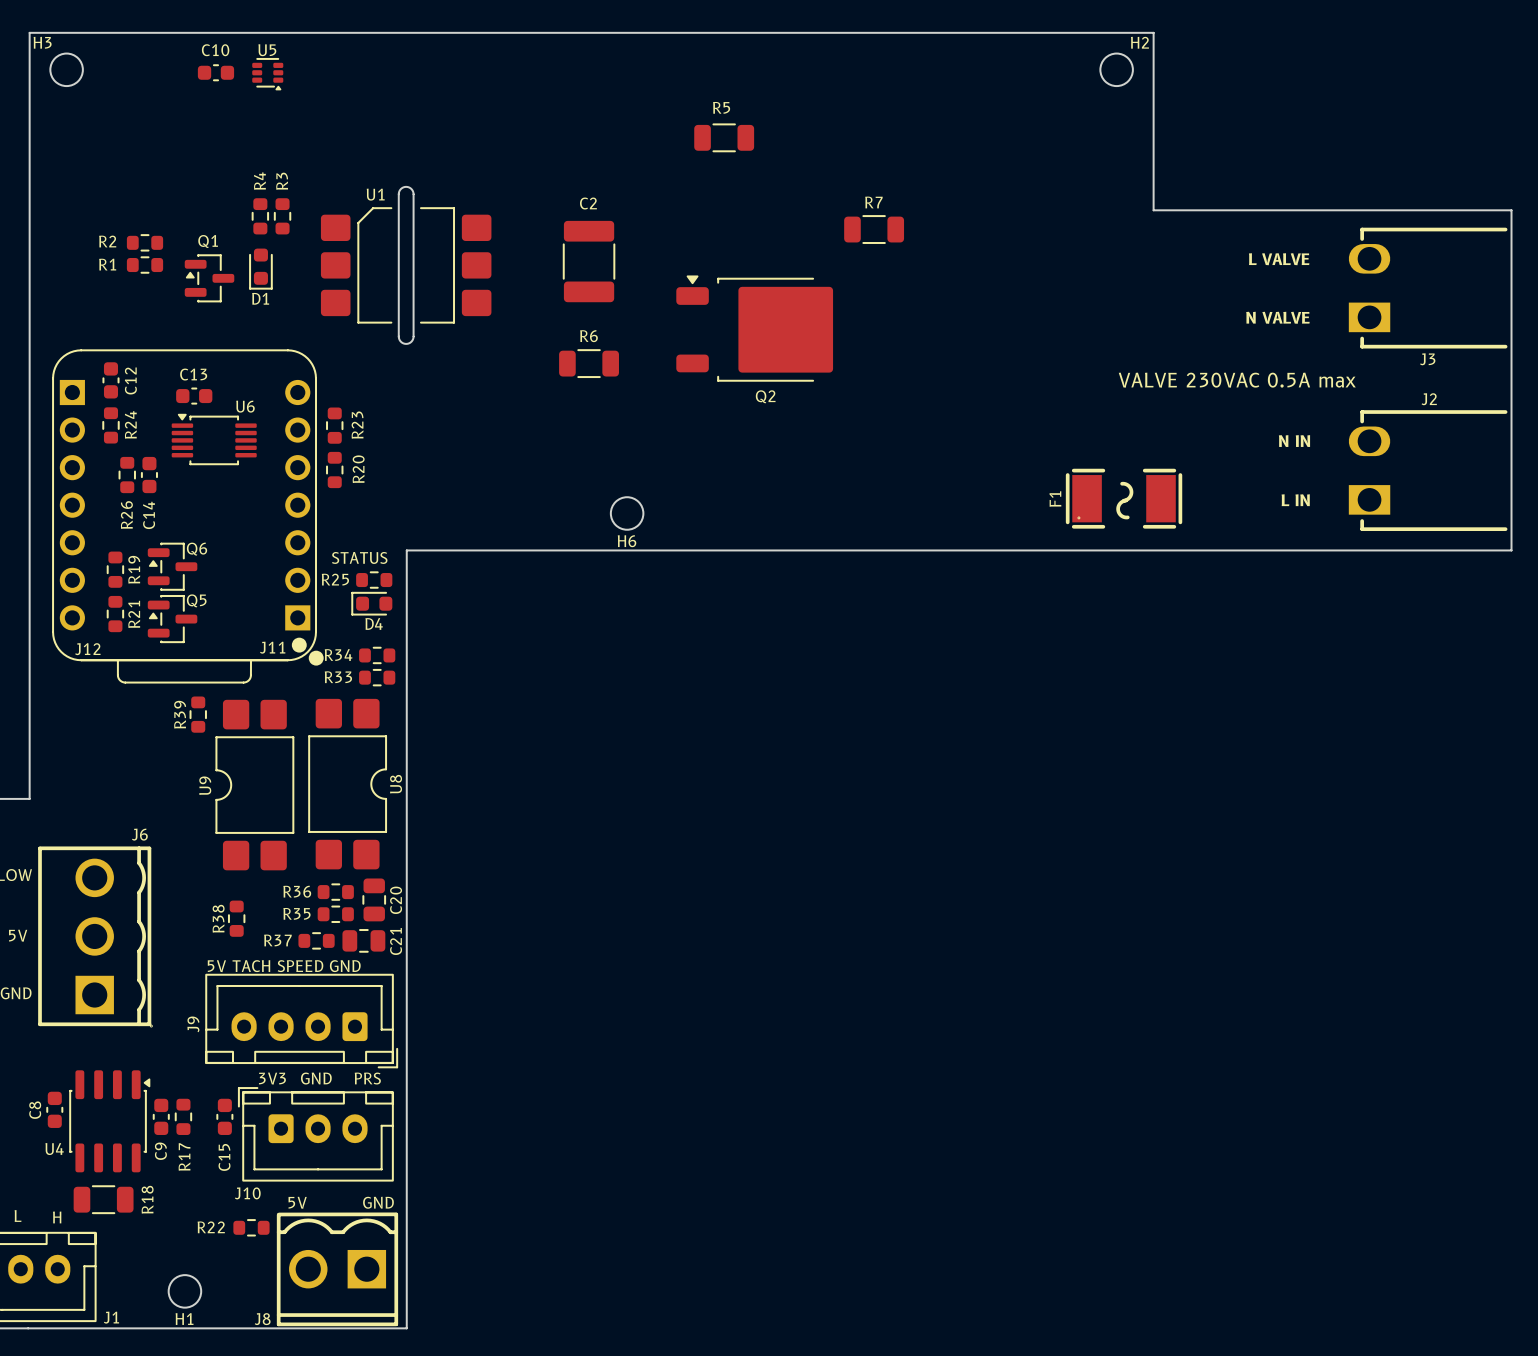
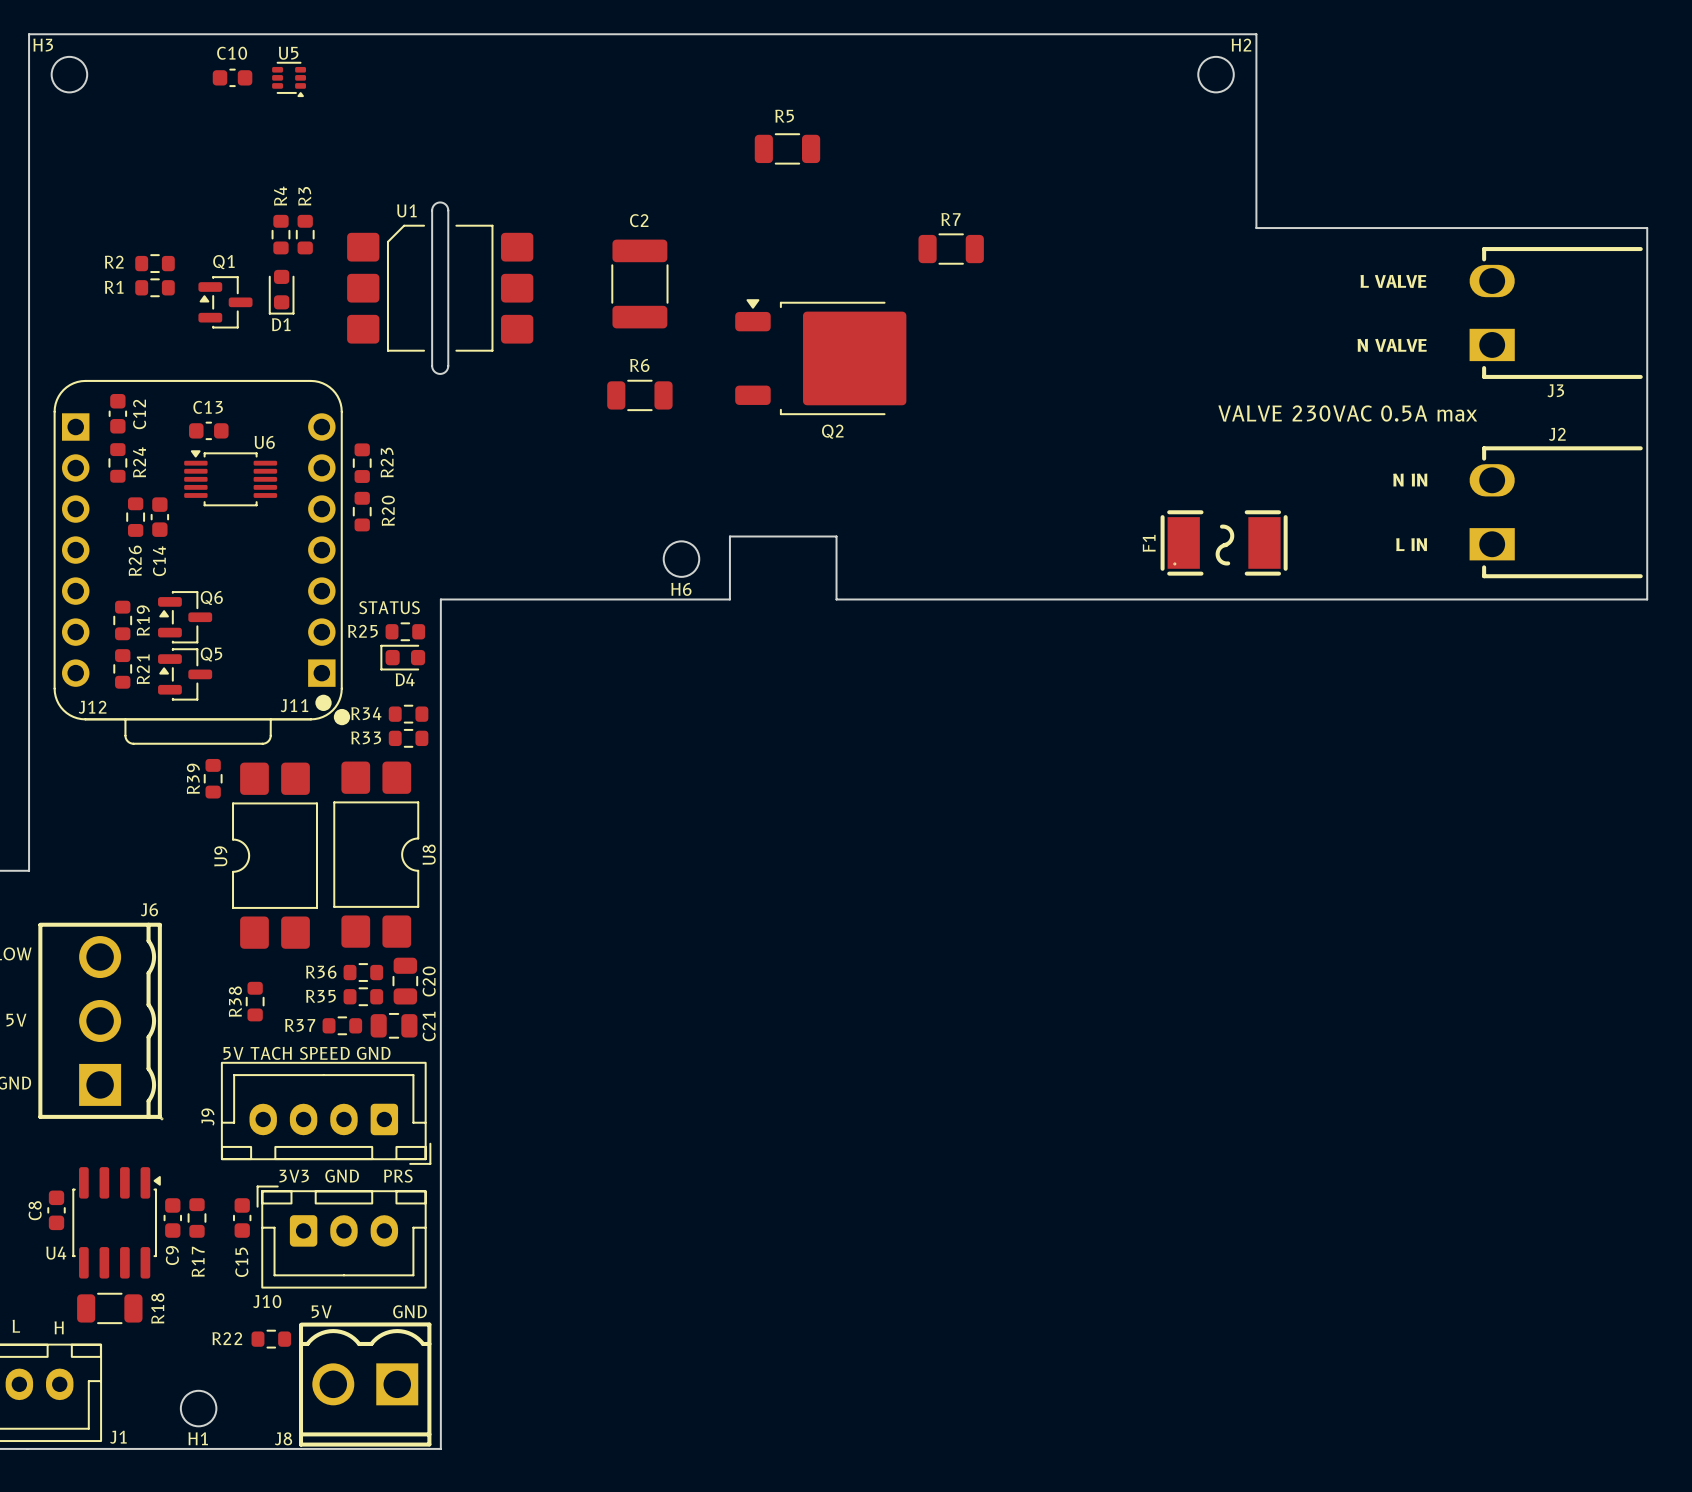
board edge: (671, 550) (769, 550) -> (729, 599) (729, 536) (836, 536) (836, 599)

